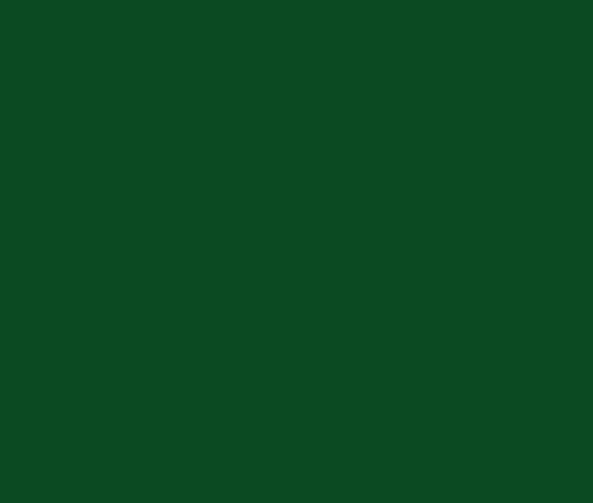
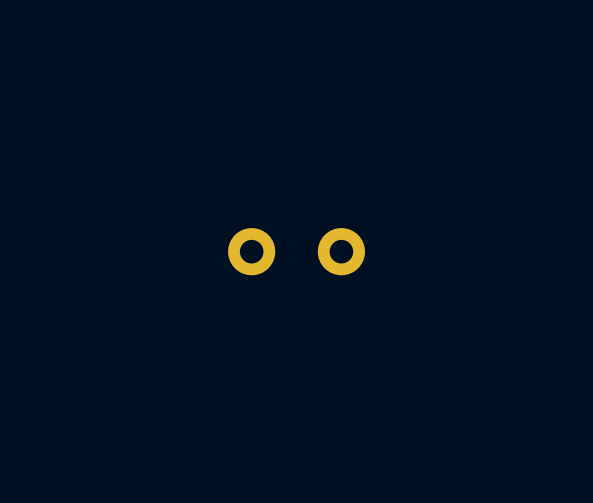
part: none -> (296, 251)

